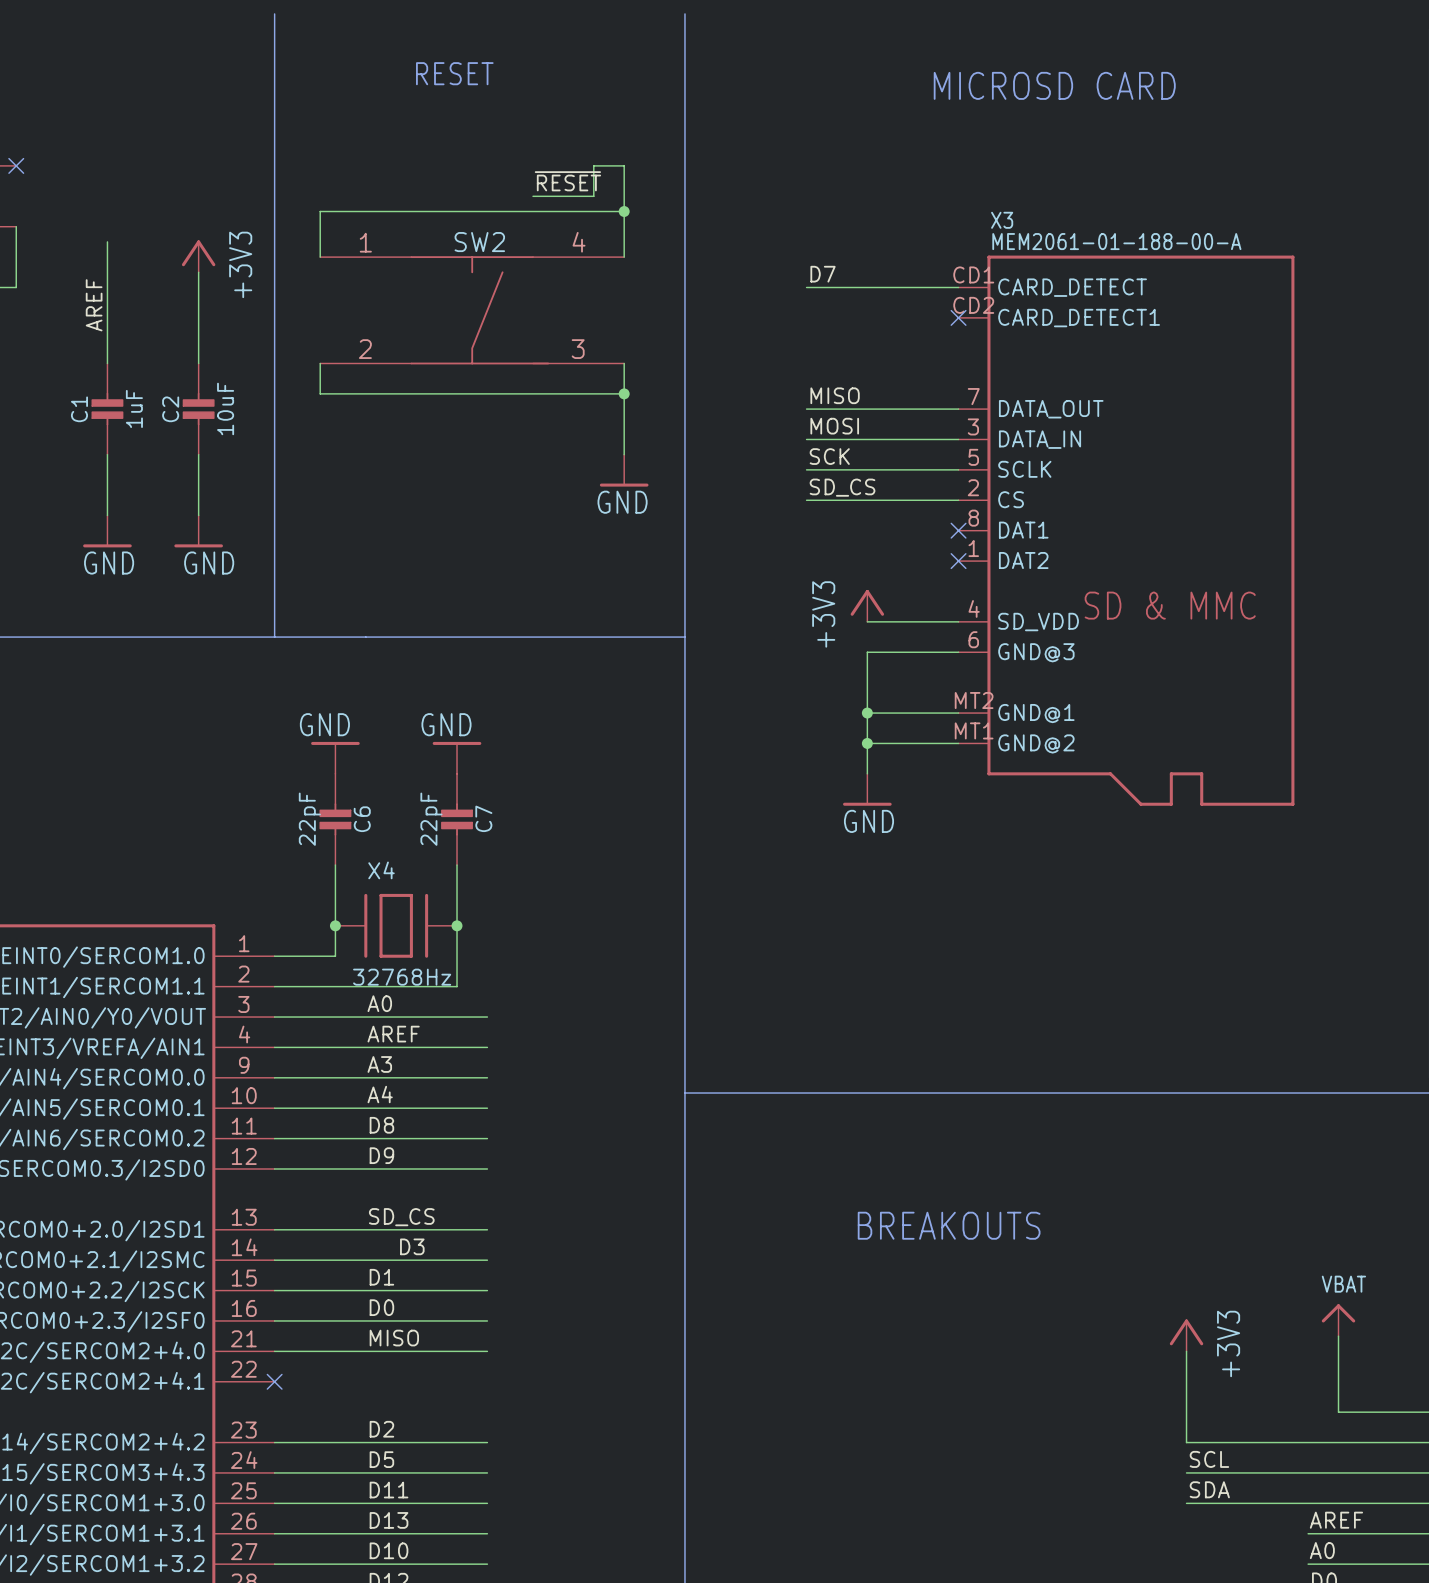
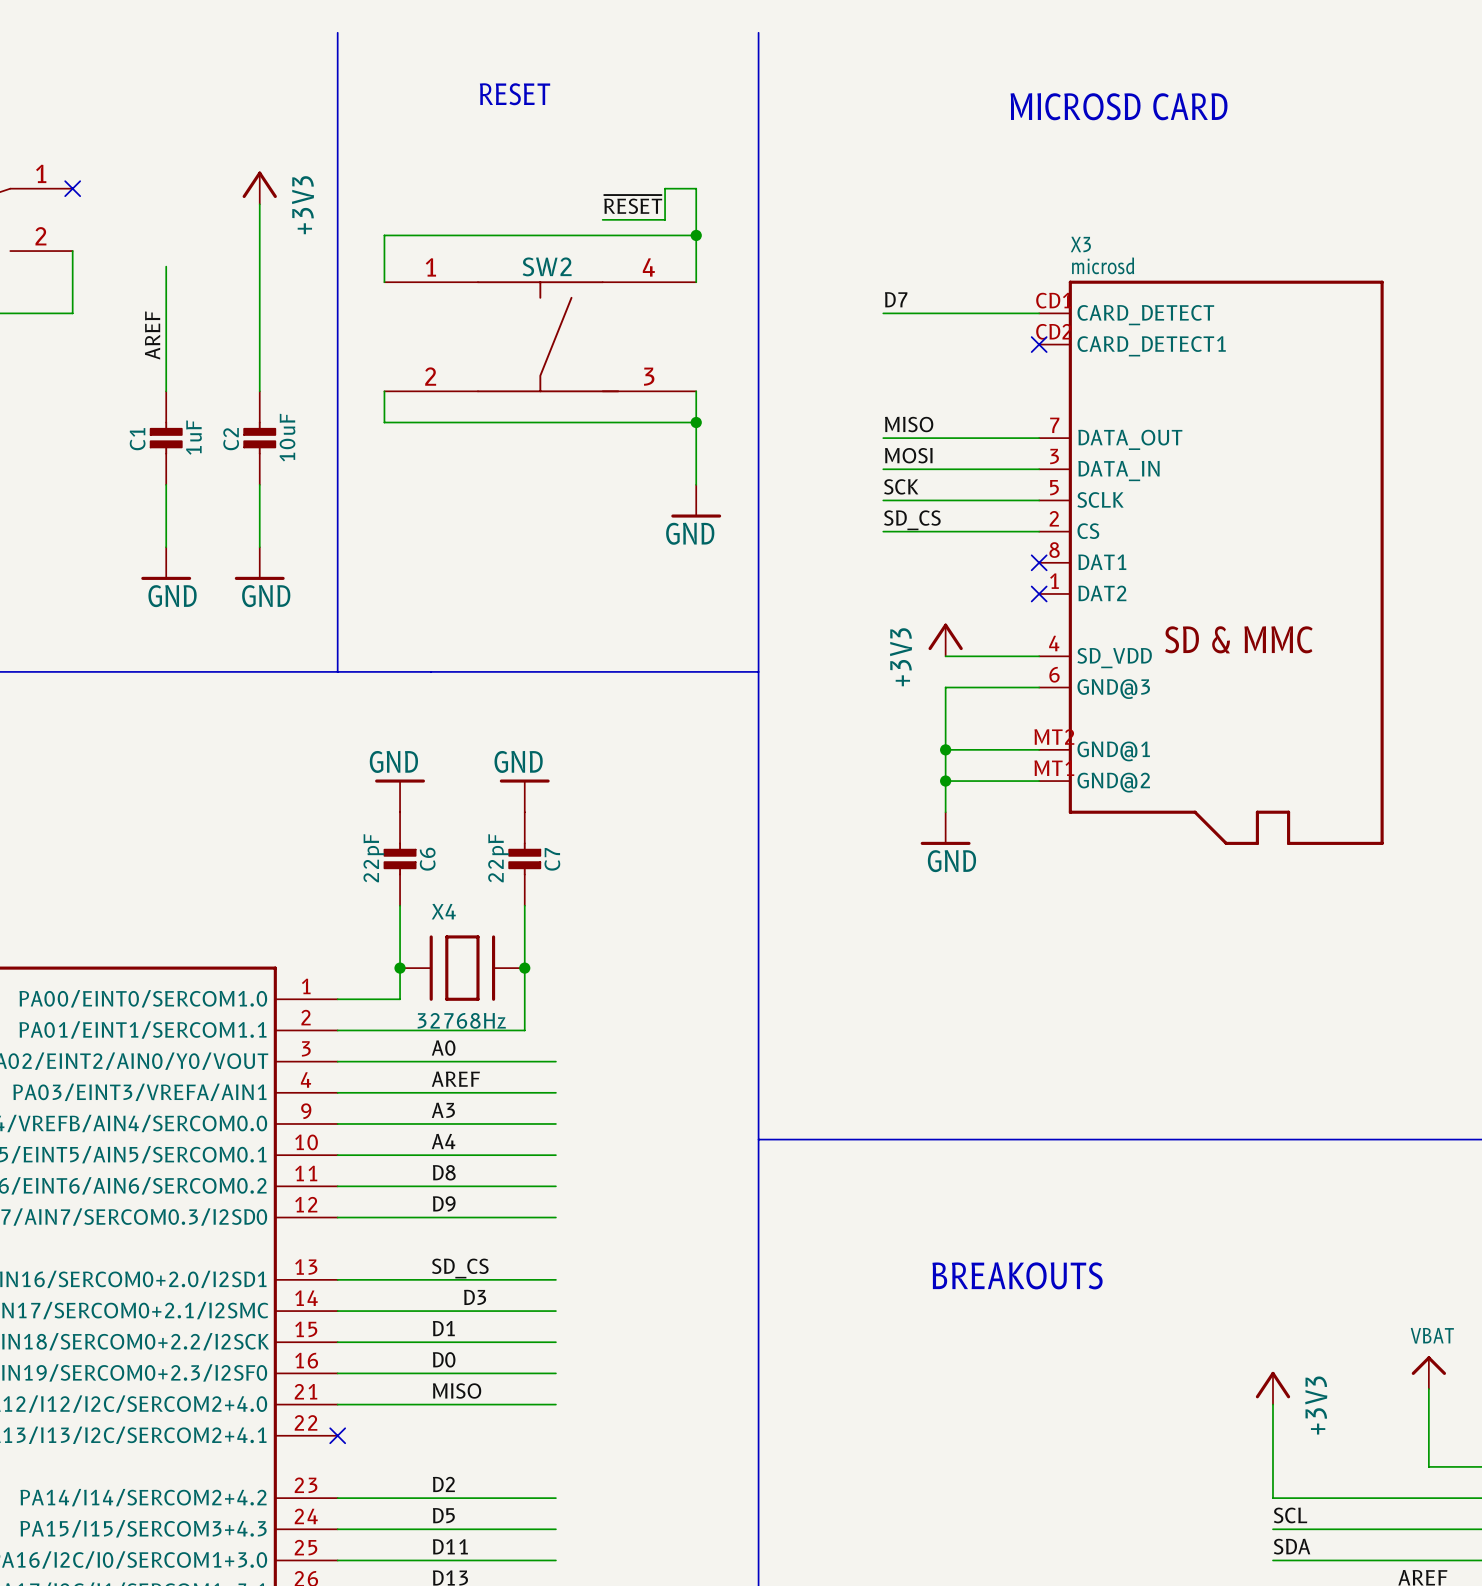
wire: none -> (259, 204) (259, 297)
X3 value: MEM2061-01-188-00-A (1116, 241) -> microsd (1103, 265)
power symbol position: +3V3 (198, 256) -> +3V3 (259, 187)

